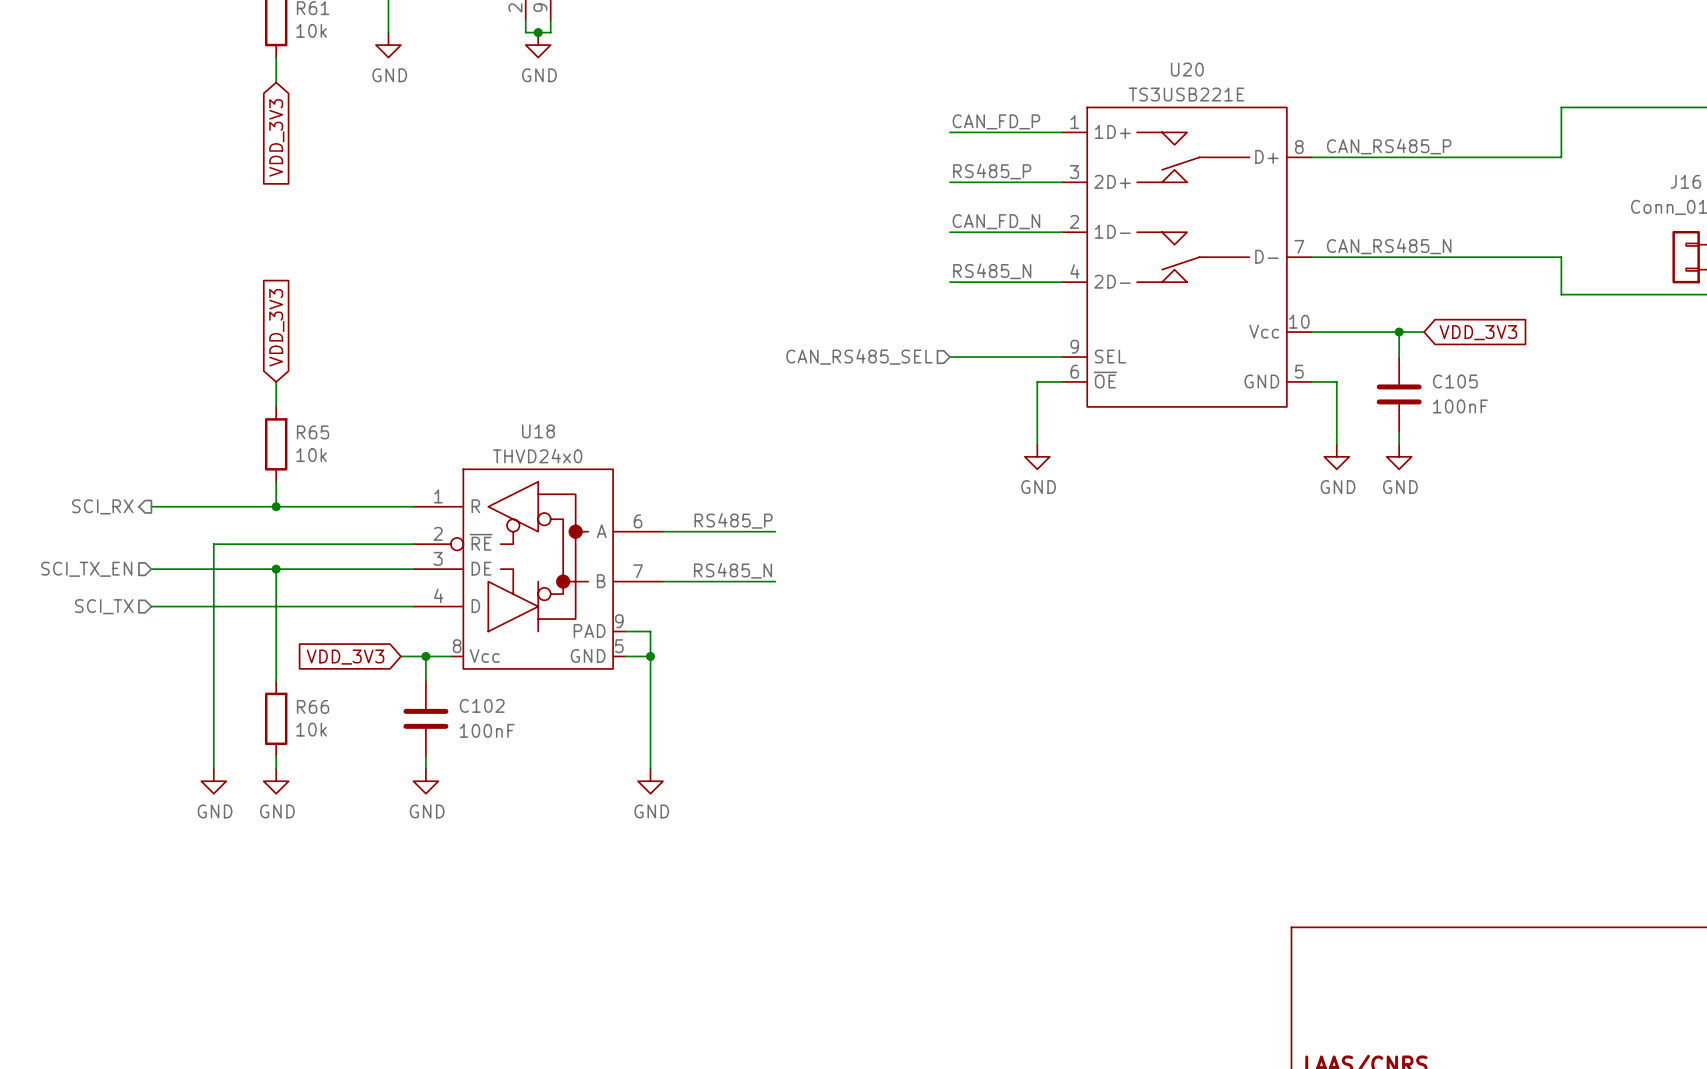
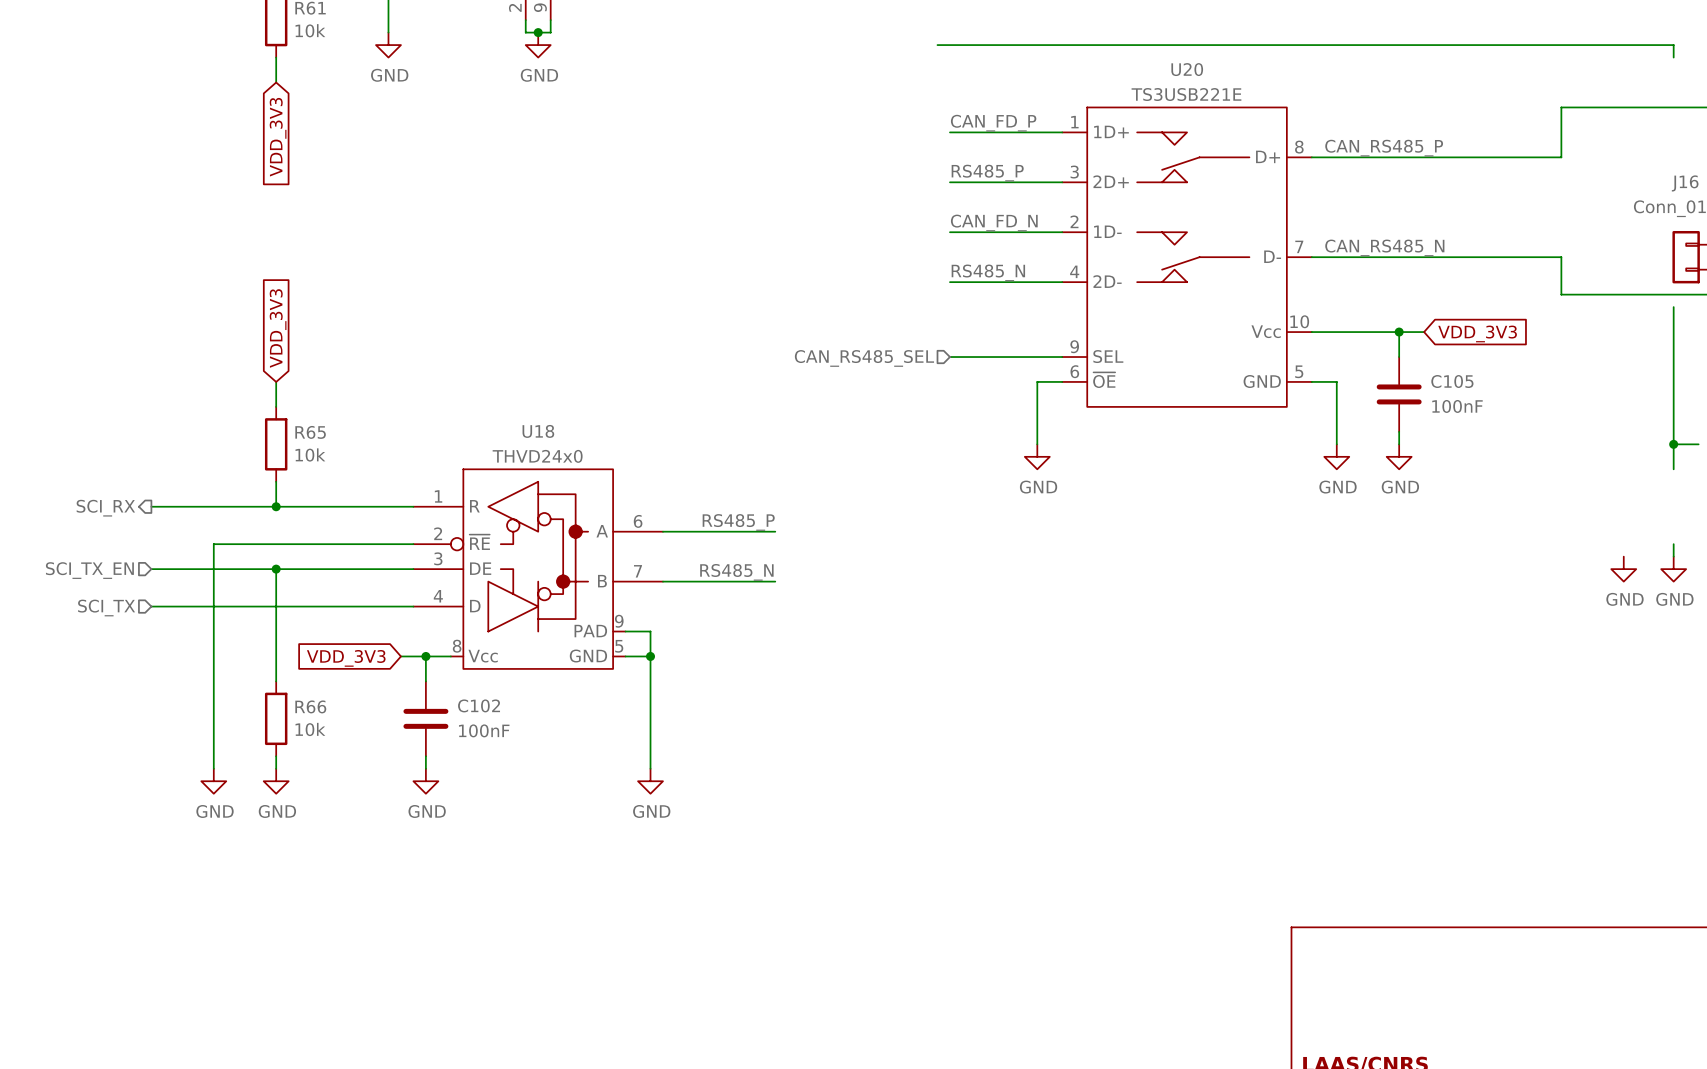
wire: none -> (937, 45) (1673, 45) (1673, 57)
wire: none -> (1673, 307) (1673, 469)
wire: none -> (1673, 444) (1698, 444)
junction: none -> (1673, 444)
wire: none -> (1673, 544) (1673, 556)
power symbol: none -> GND (1623, 569)
power symbol: none -> GND (1673, 569)

